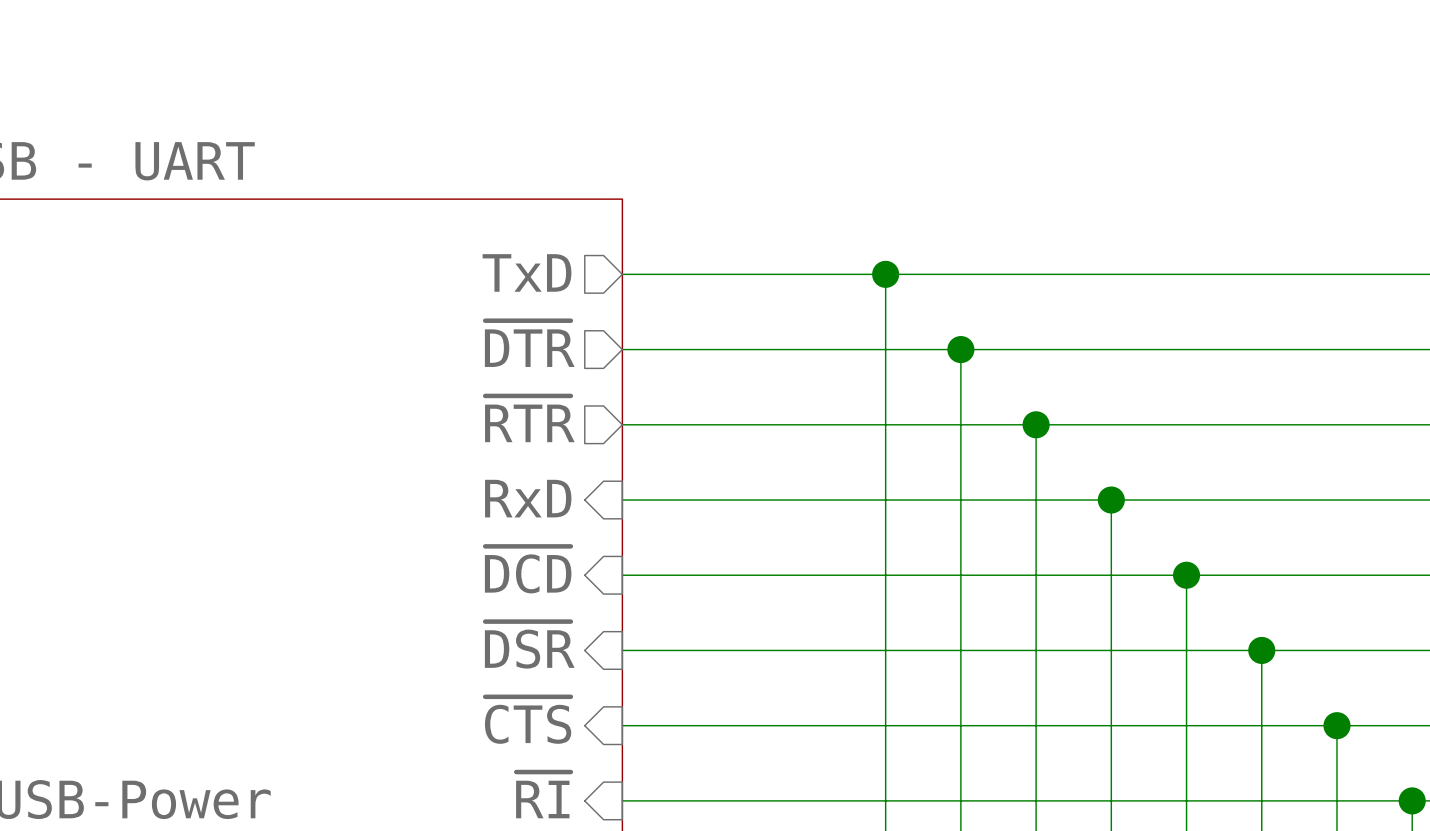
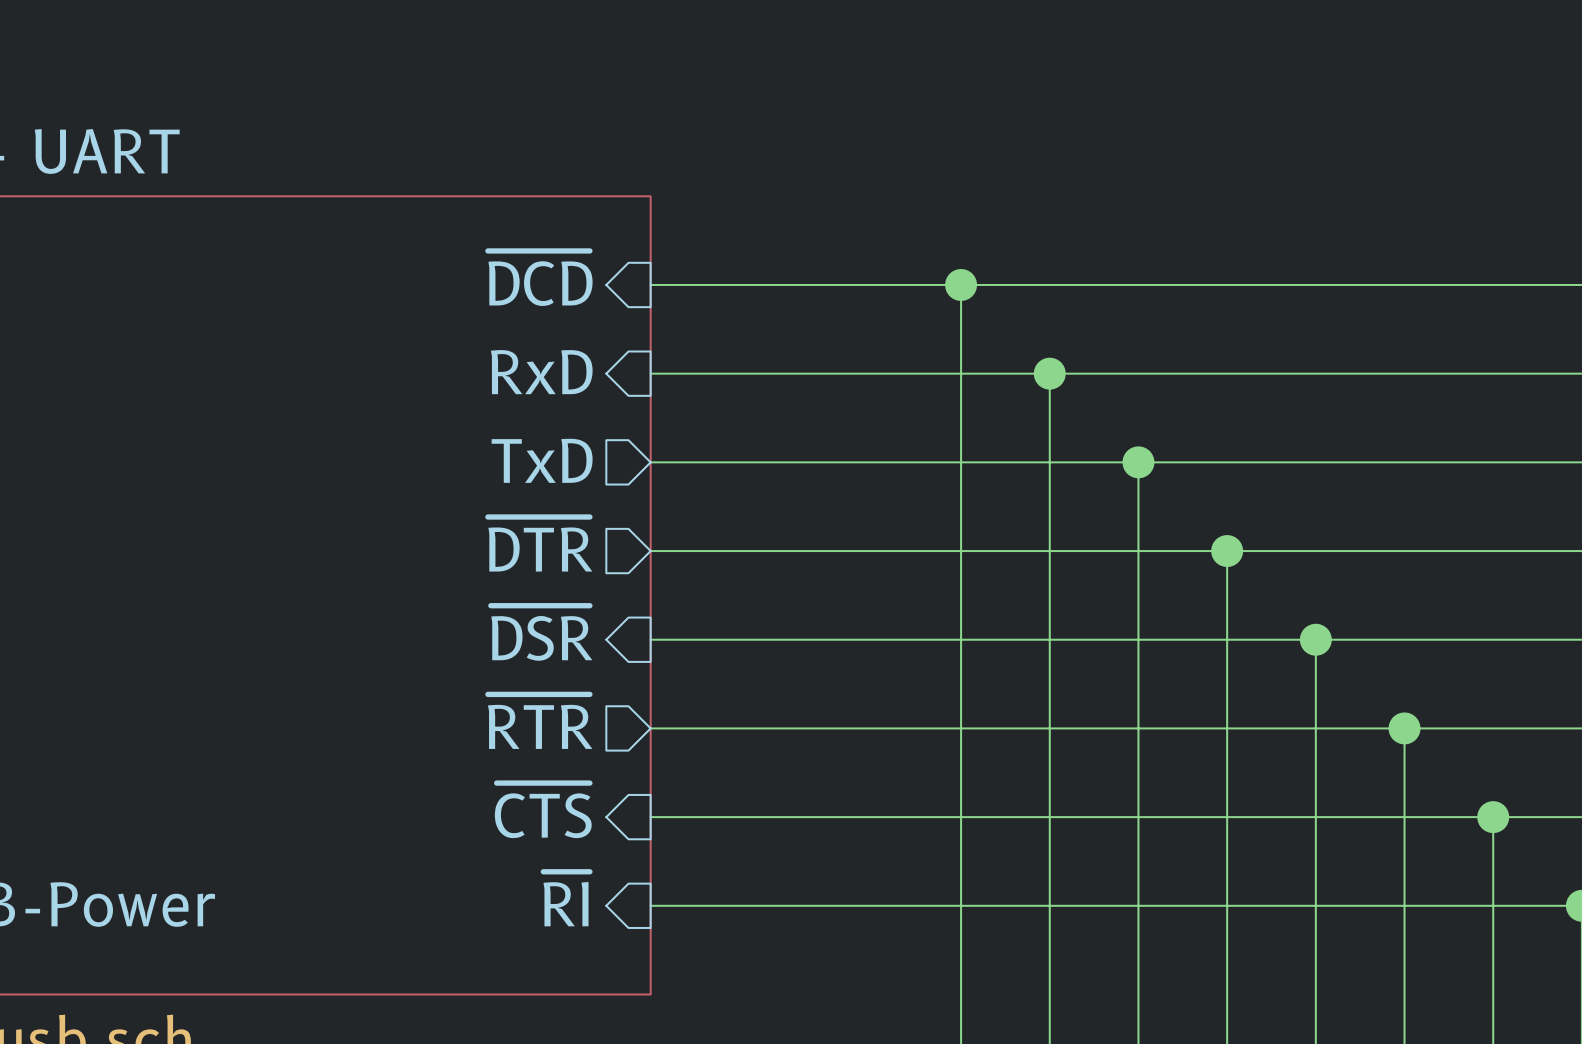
sheet pin shape: output (527, 272) -> input (540, 278)
sheet pin: TxD (527, 272) -> ~{DCD} (540, 278)
sheet pin shape: output (529, 343) -> input (541, 372)
sheet pin: ~{DTR} (529, 343) -> RxD (541, 372)
sheet pin: ~{RTR} (529, 419) -> TxD (542, 460)
sheet pin shape: input (528, 498) -> output (540, 544)
sheet pin: RxD (528, 498) -> ~{DTR} (540, 544)
sheet pin: ~{DCD} (528, 569) -> ~{DSR} (541, 633)
sheet pin shape: input (529, 645) -> output (540, 721)
sheet pin: ~{DSR} (529, 645) -> ~{RTR} (540, 721)

